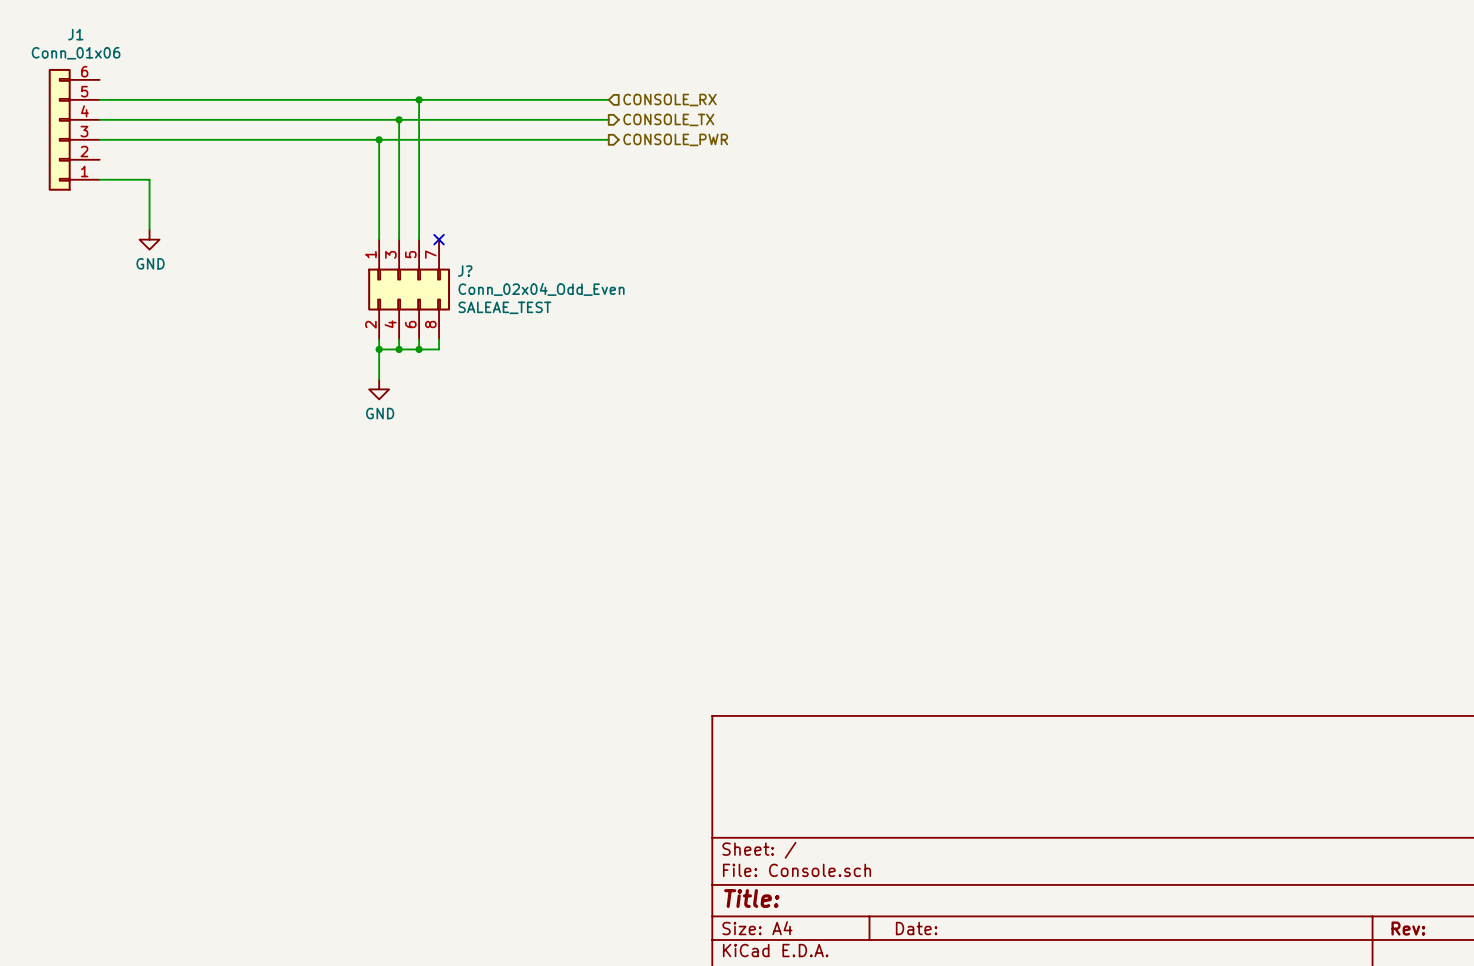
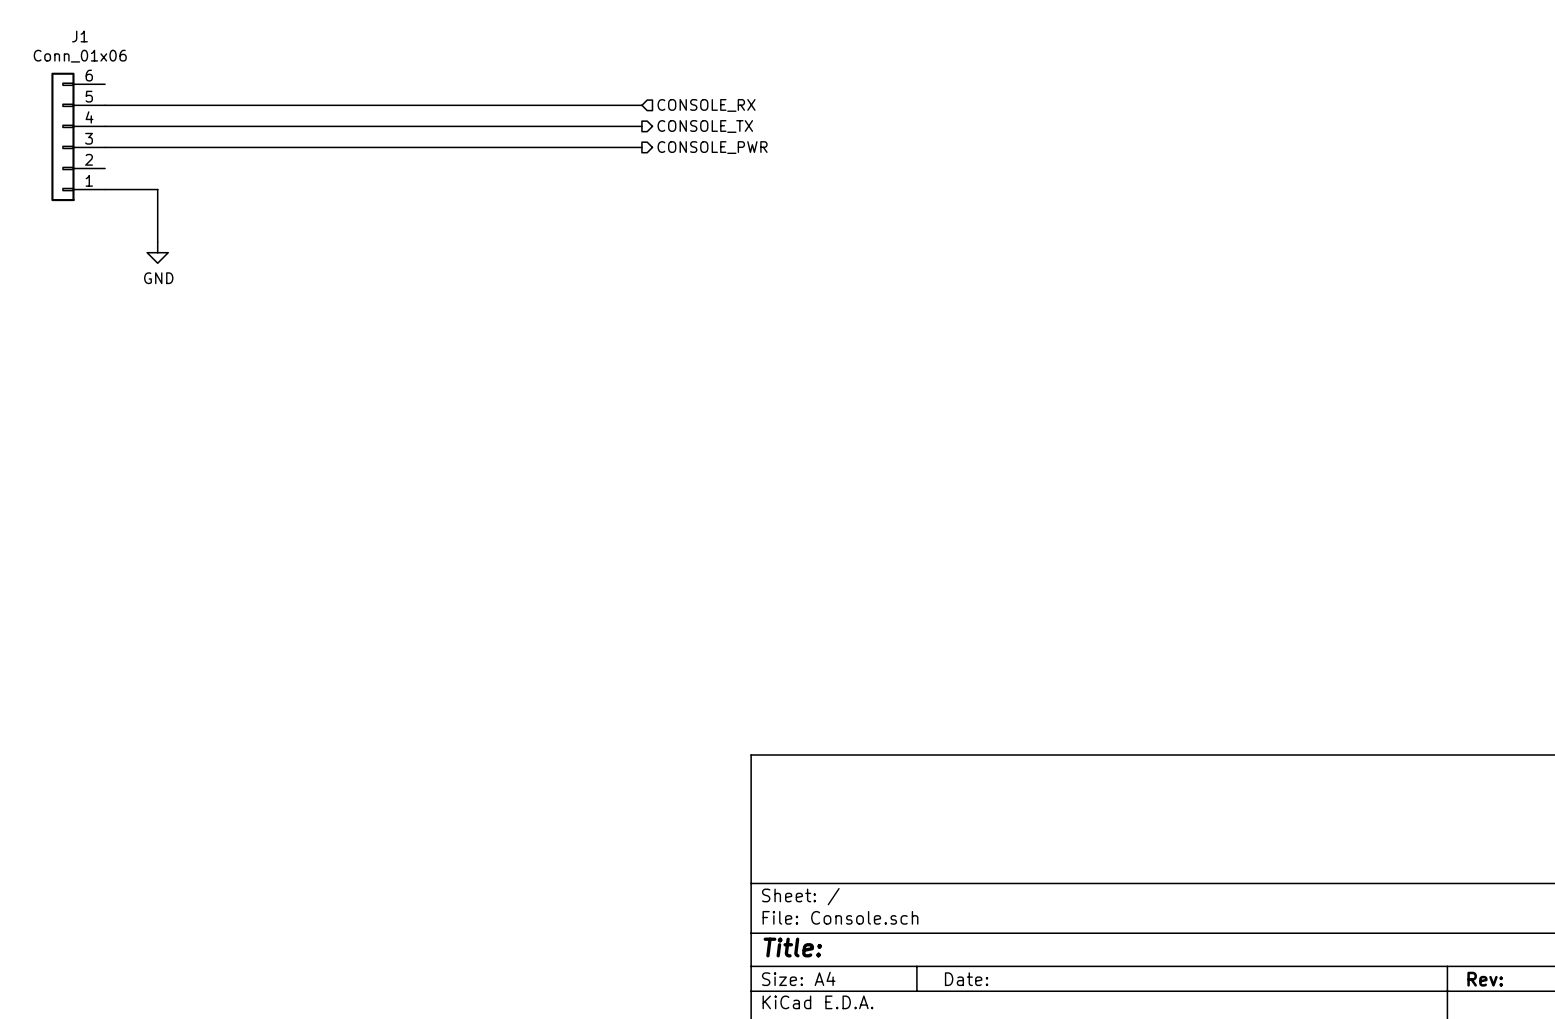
wire: (419, 99) (419, 239) -> none
junction: (419, 99) -> none
wire: (399, 119) (399, 239) -> none
junction: (399, 119) -> none
wire: (379, 139) (379, 239) -> none
junction: (379, 139) -> none
no-connect mark: (439, 239) -> none
J?: Conn_02x04_Odd_Even (409, 289) -> none
wire: (379, 339) (379, 379) -> none
wire: (399, 339) (399, 349) -> none
wire: (419, 339) (419, 349) -> none
wire: (439, 339) (439, 349) (379, 349) -> none
junction: (379, 349) -> none
junction: (399, 349) -> none
junction: (419, 349) -> none
power symbol: GND (379, 389) -> none

